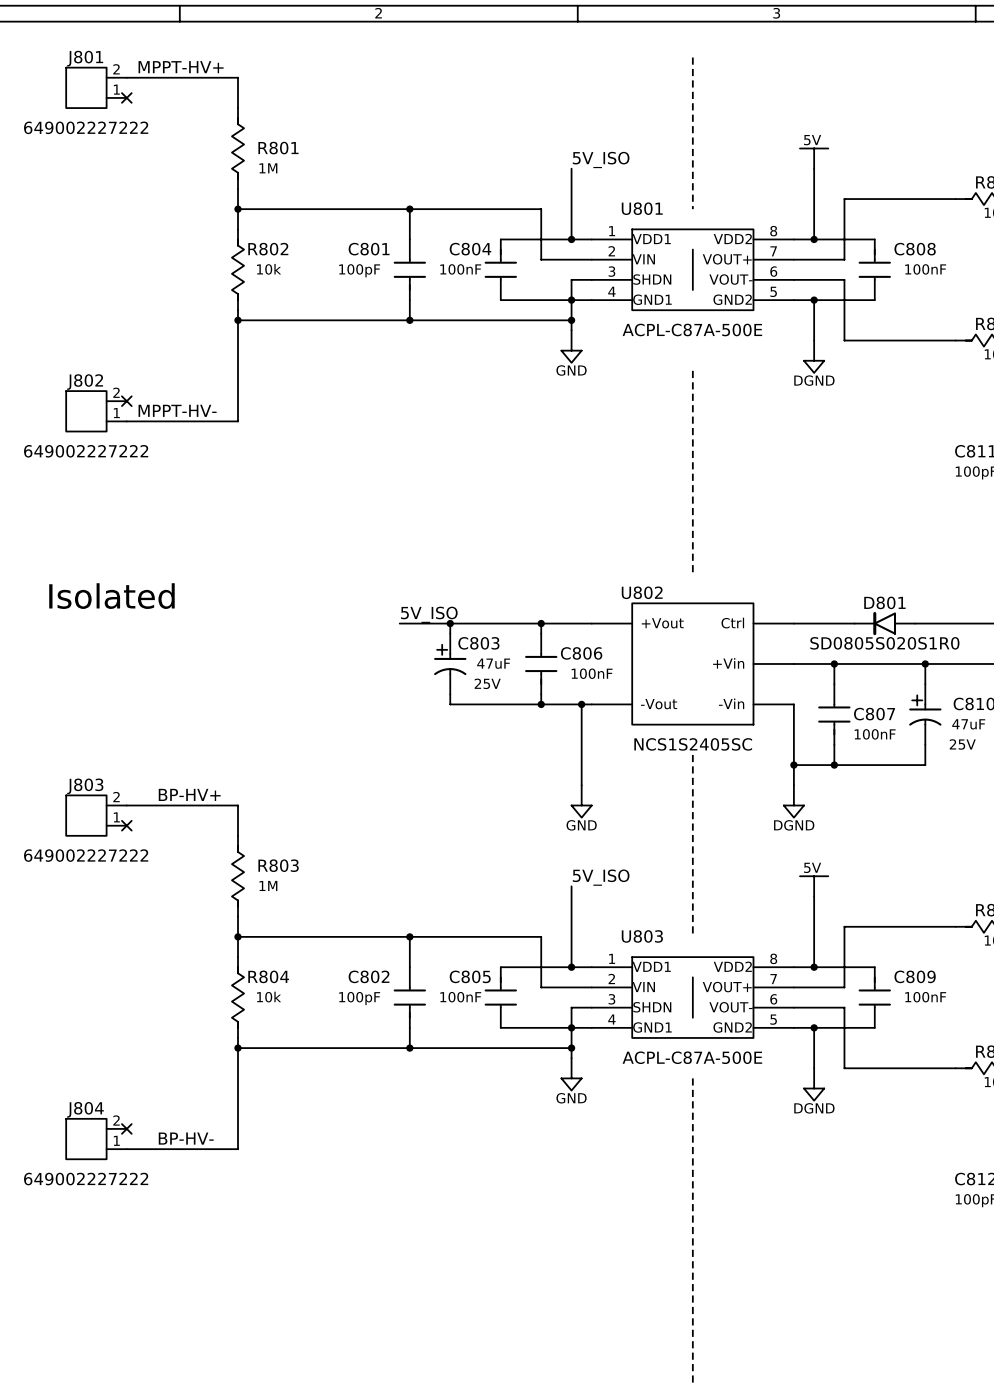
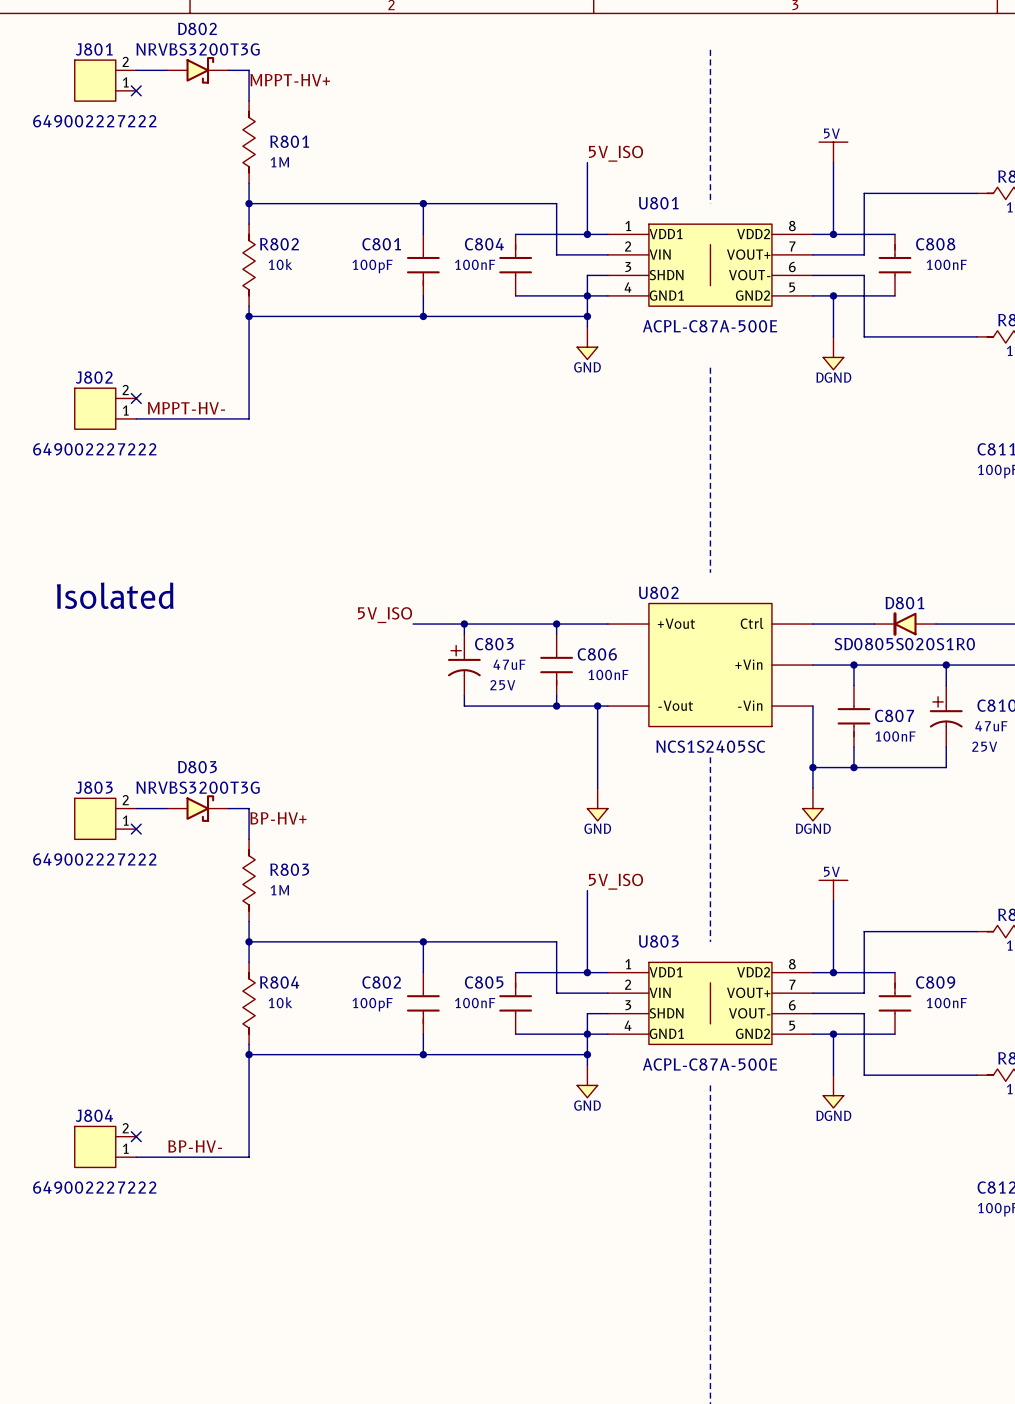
label position: MPPT-HV+ (181, 67) -> MPPT-HV+ (290, 80)
D802: none -> NRVBS3200T3G (197, 70)
label position: 5V_ISO (429, 614) -> 5V_ISO (385, 615)
label position: BP-HV+ (189, 794) -> BP-HV+ (278, 818)
D803: none -> NRVBS3200T3G (197, 808)

